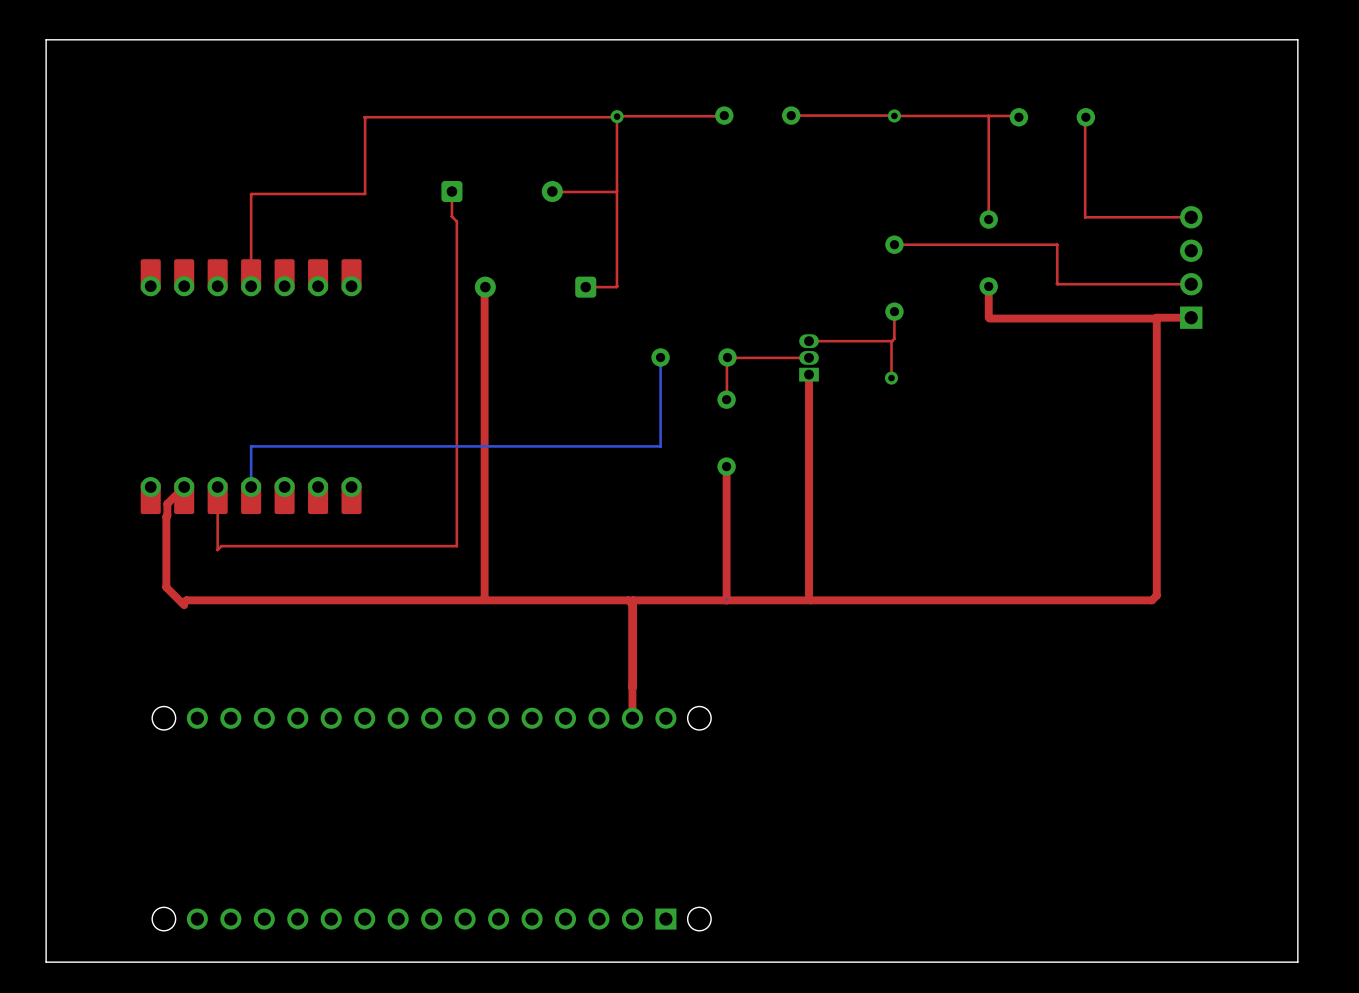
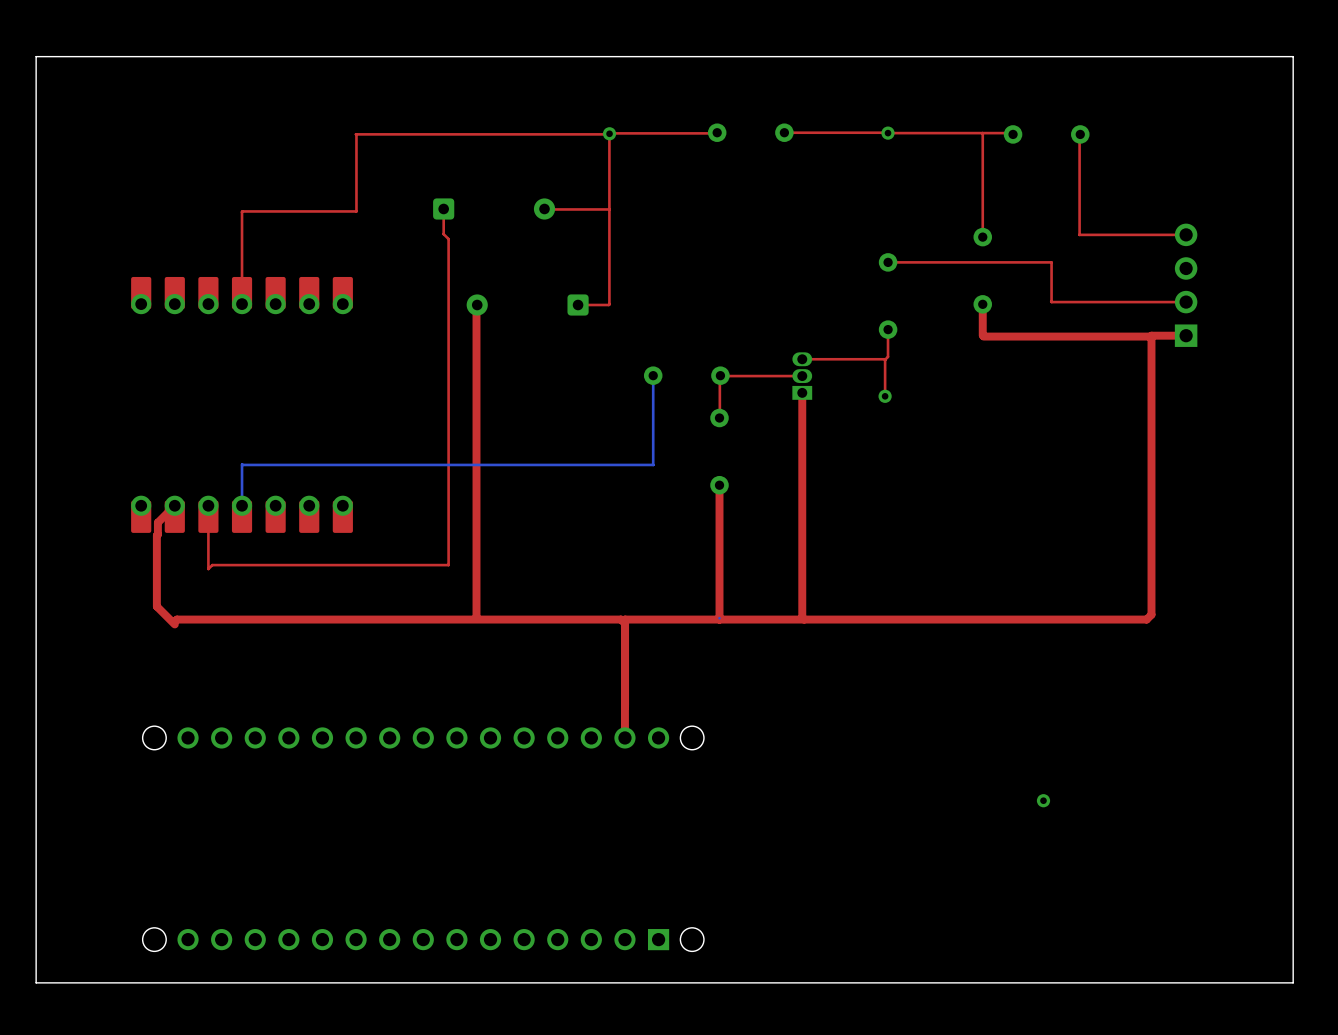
part: none -> (1043, 800)

